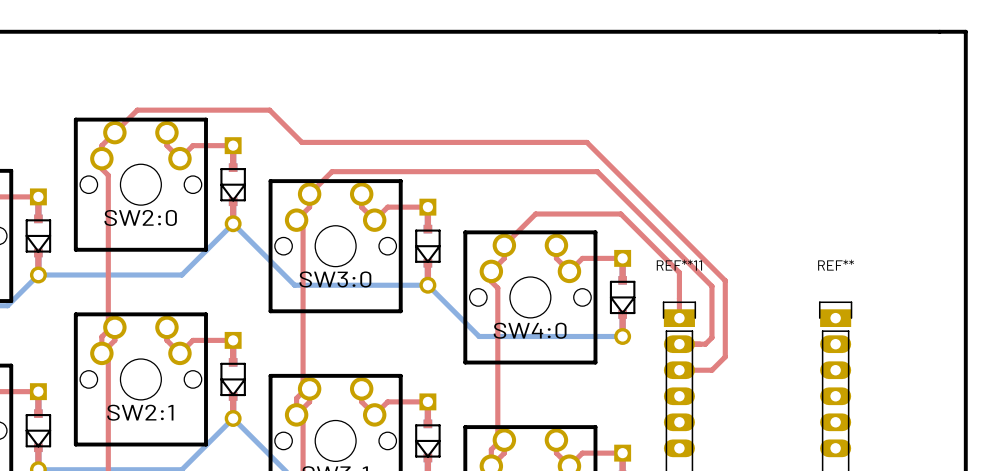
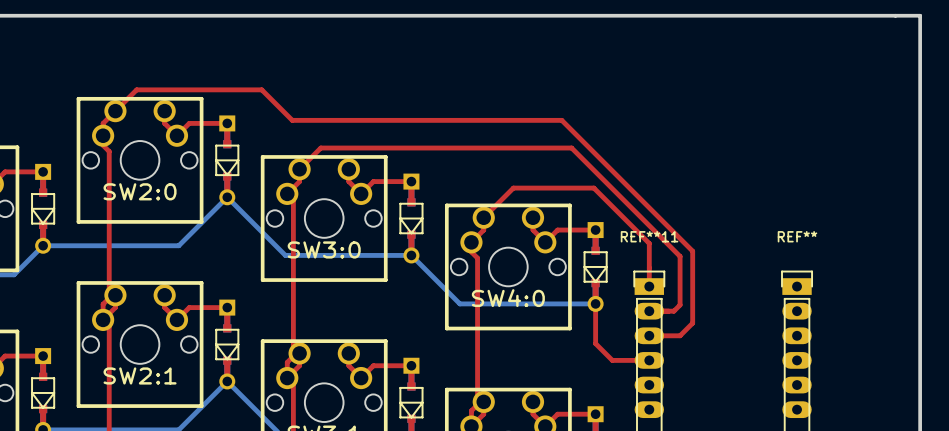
top track: none -> (595, 303) (595, 343) (612, 360) (649, 360)

